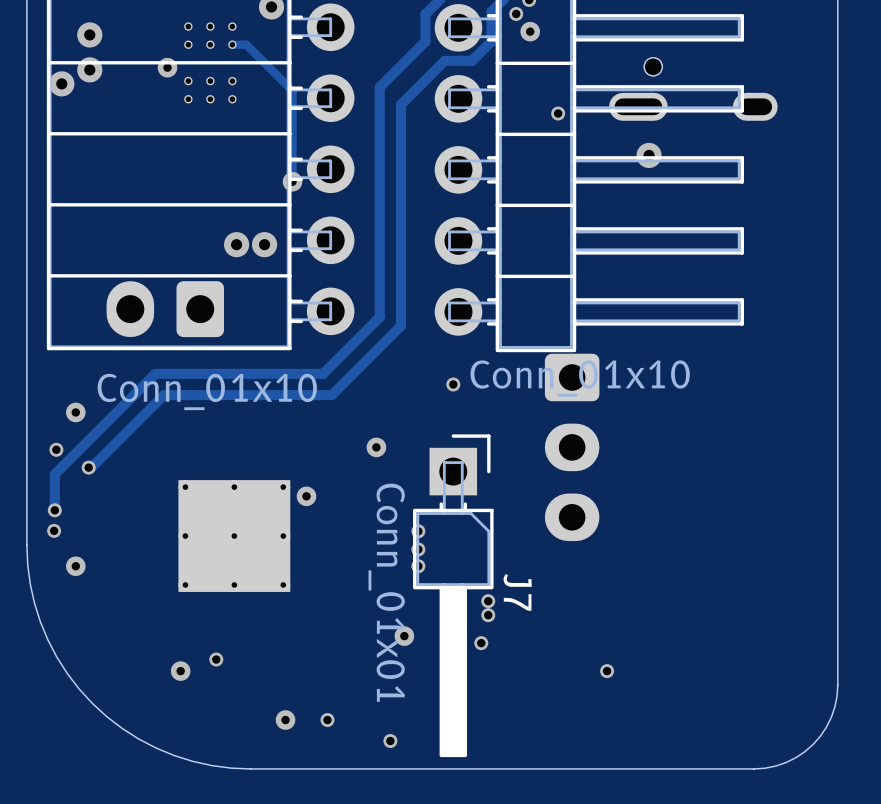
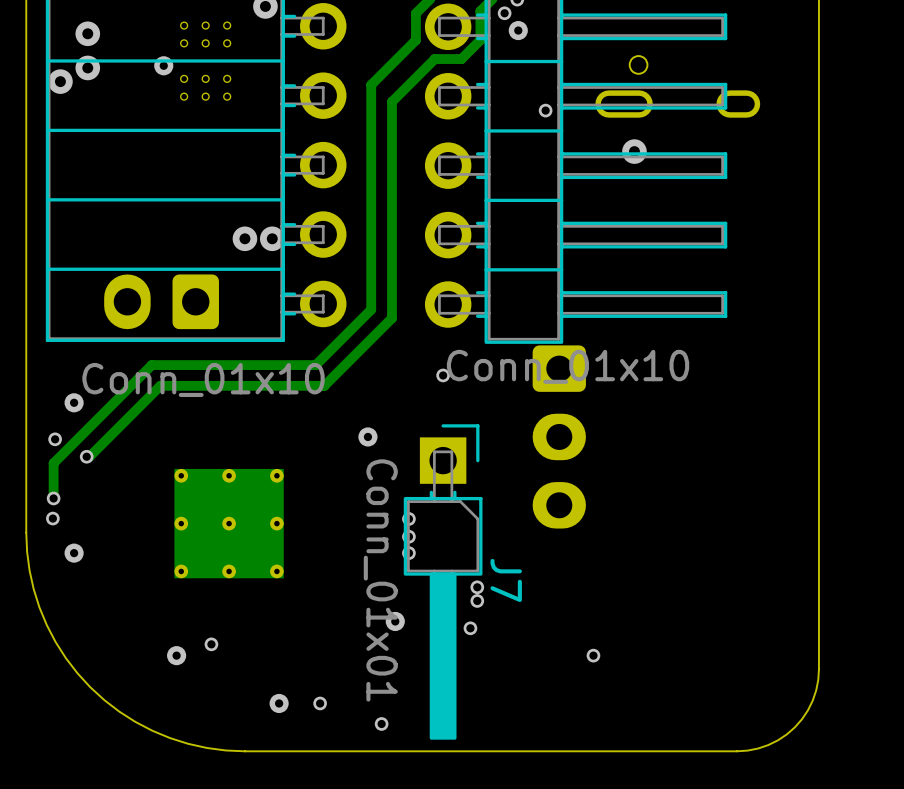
track: (232, 44) (246, 44) (292, 90) (292, 181) -> none
via: (292, 181) -> none
via: (236, 244) -> none
via: none -> (244, 238)
via: (264, 244) -> none
via: none -> (272, 238)
via: (306, 496) -> none

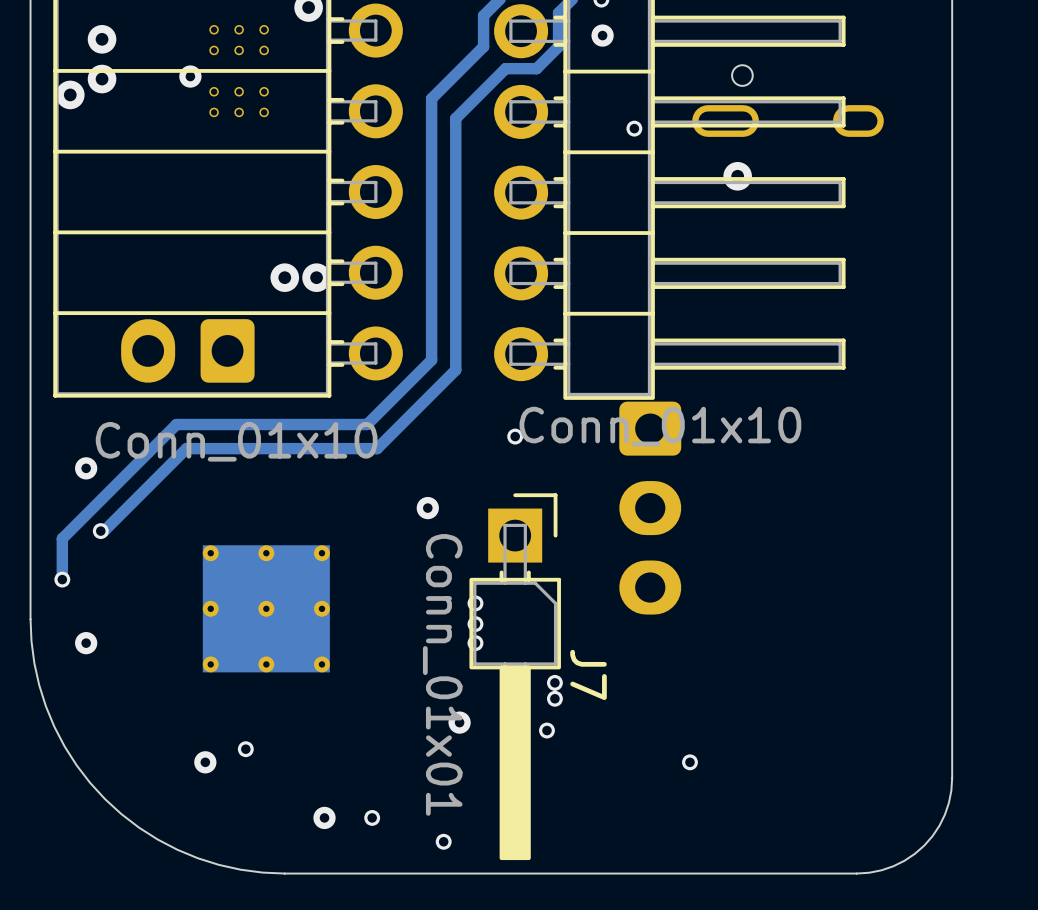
via: (504, 13) -> none
via: (55, 439) -> none
via: (52, 518) -> none

